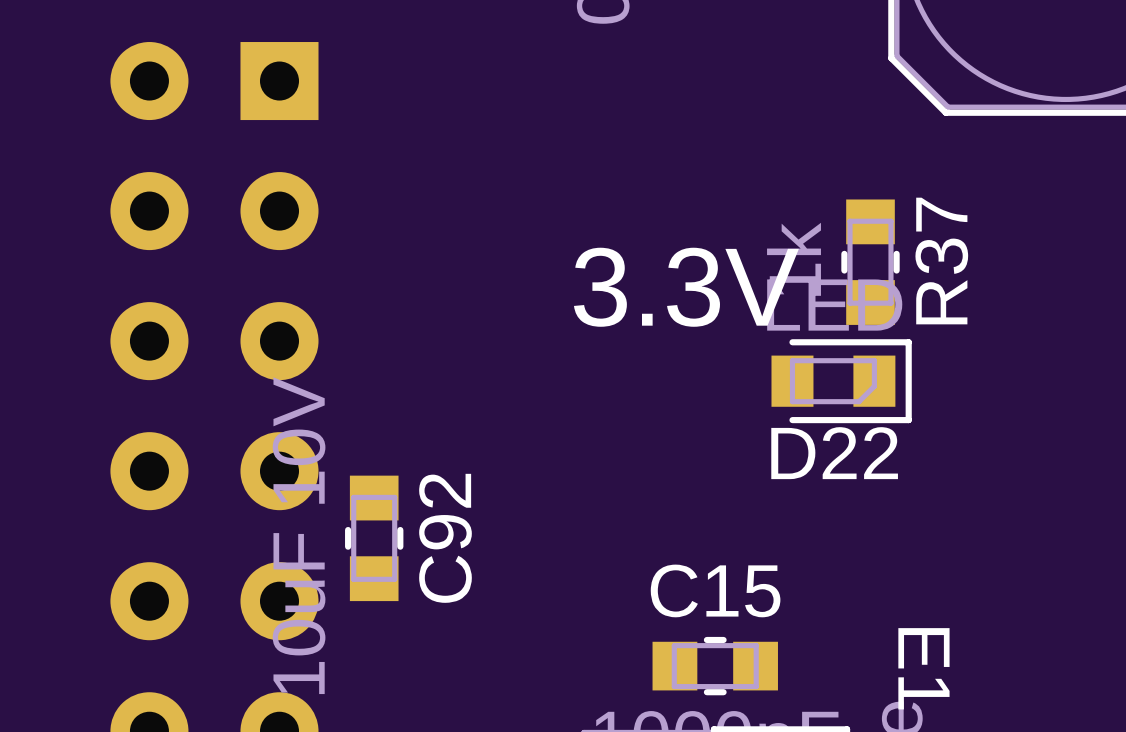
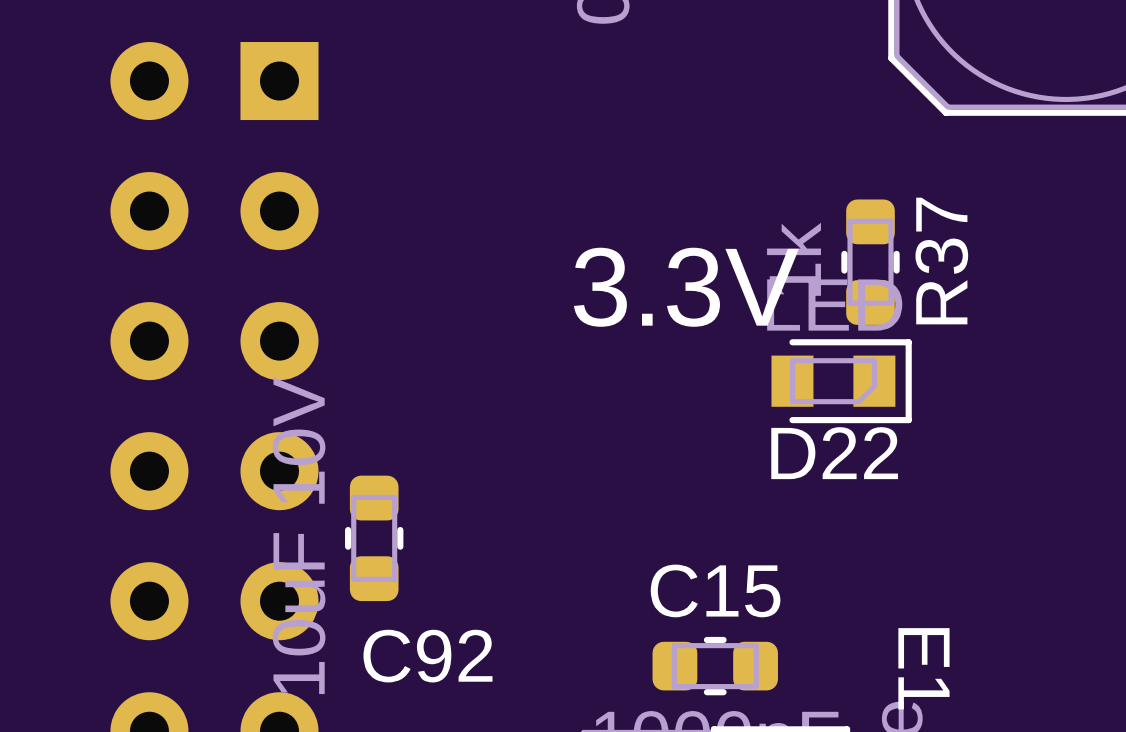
R37 footprint: [841, 199, 900, 325] -> [841, 199, 900, 325]
C92 footprint: [345, 475, 404, 602] -> [345, 475, 404, 602]
C92 name rotation: 0° (445, 538) -> 90° clockwise (427, 656)
C15 footprint: [652, 636, 778, 696] -> [652, 636, 778, 696]

